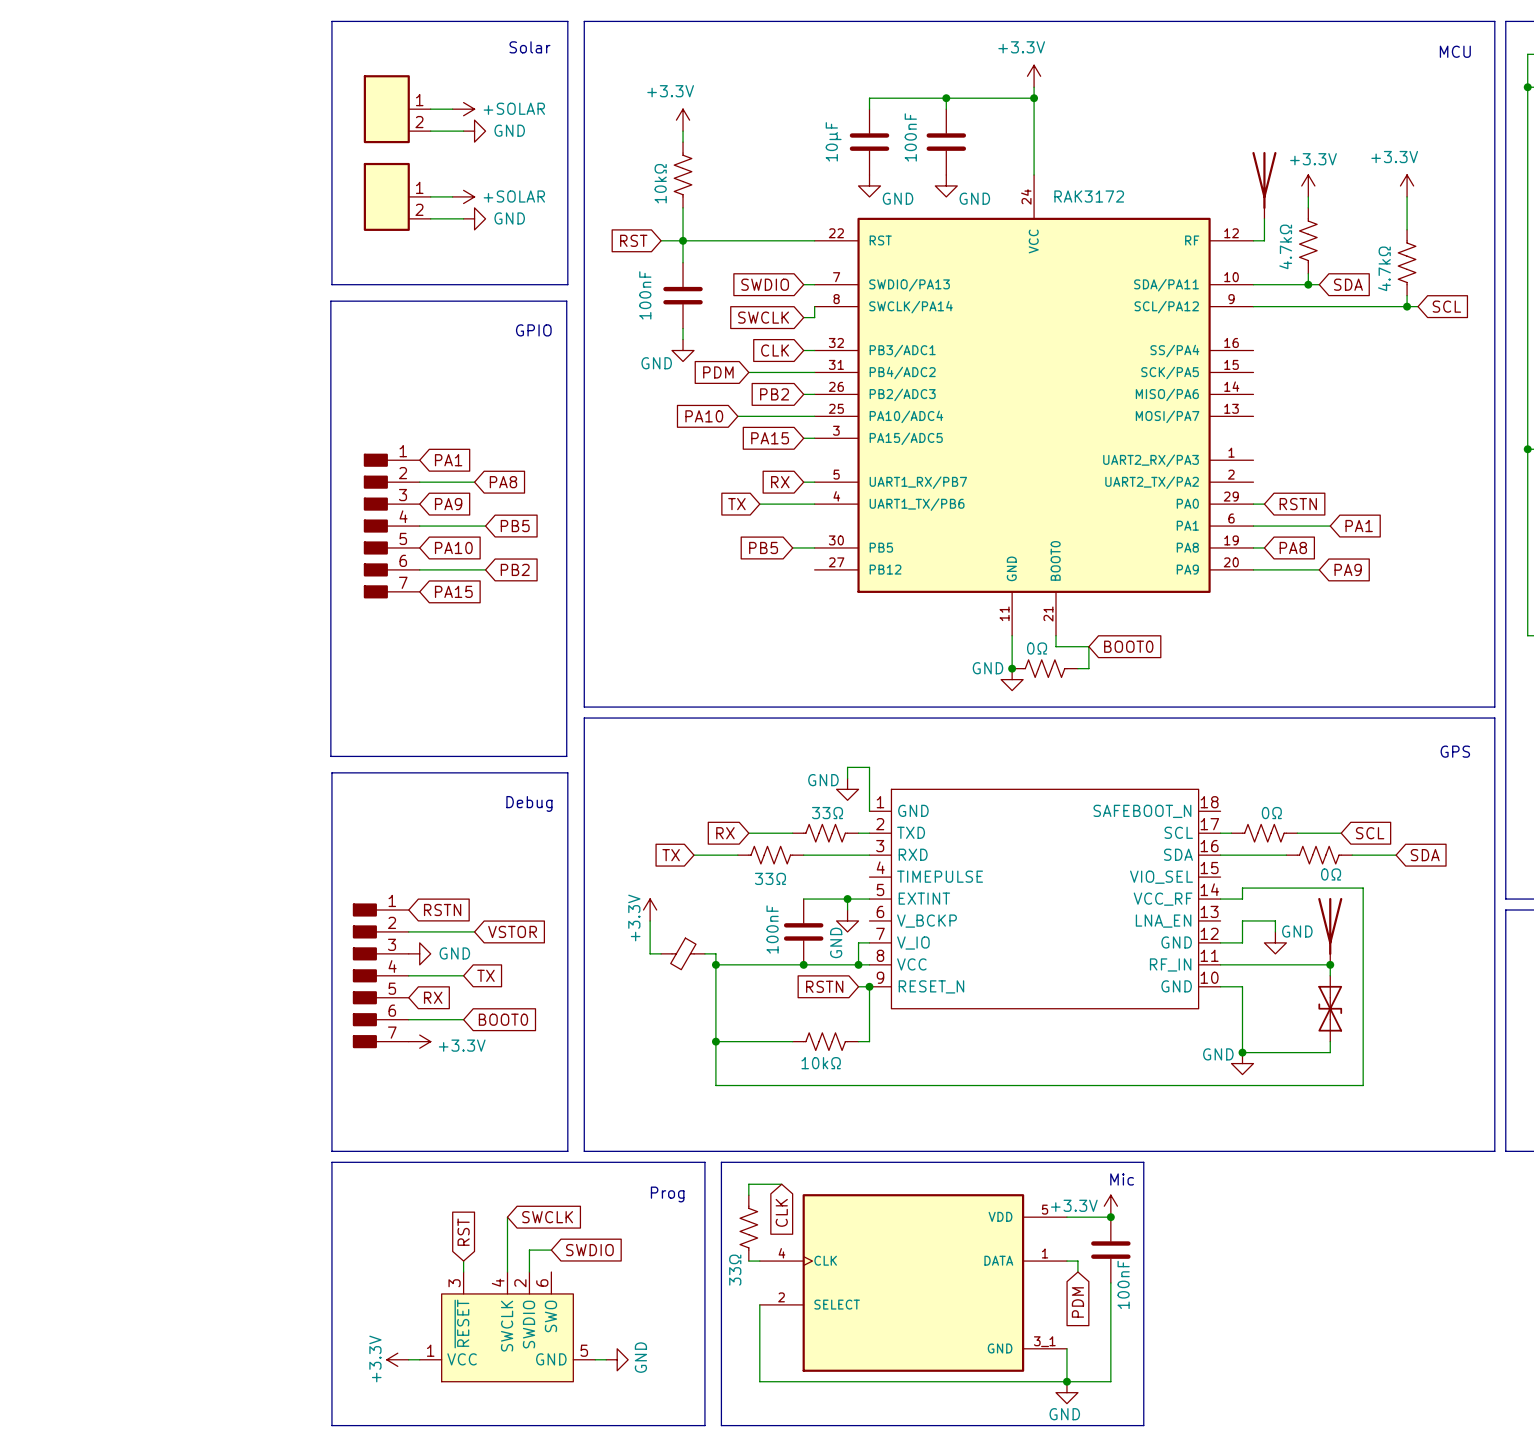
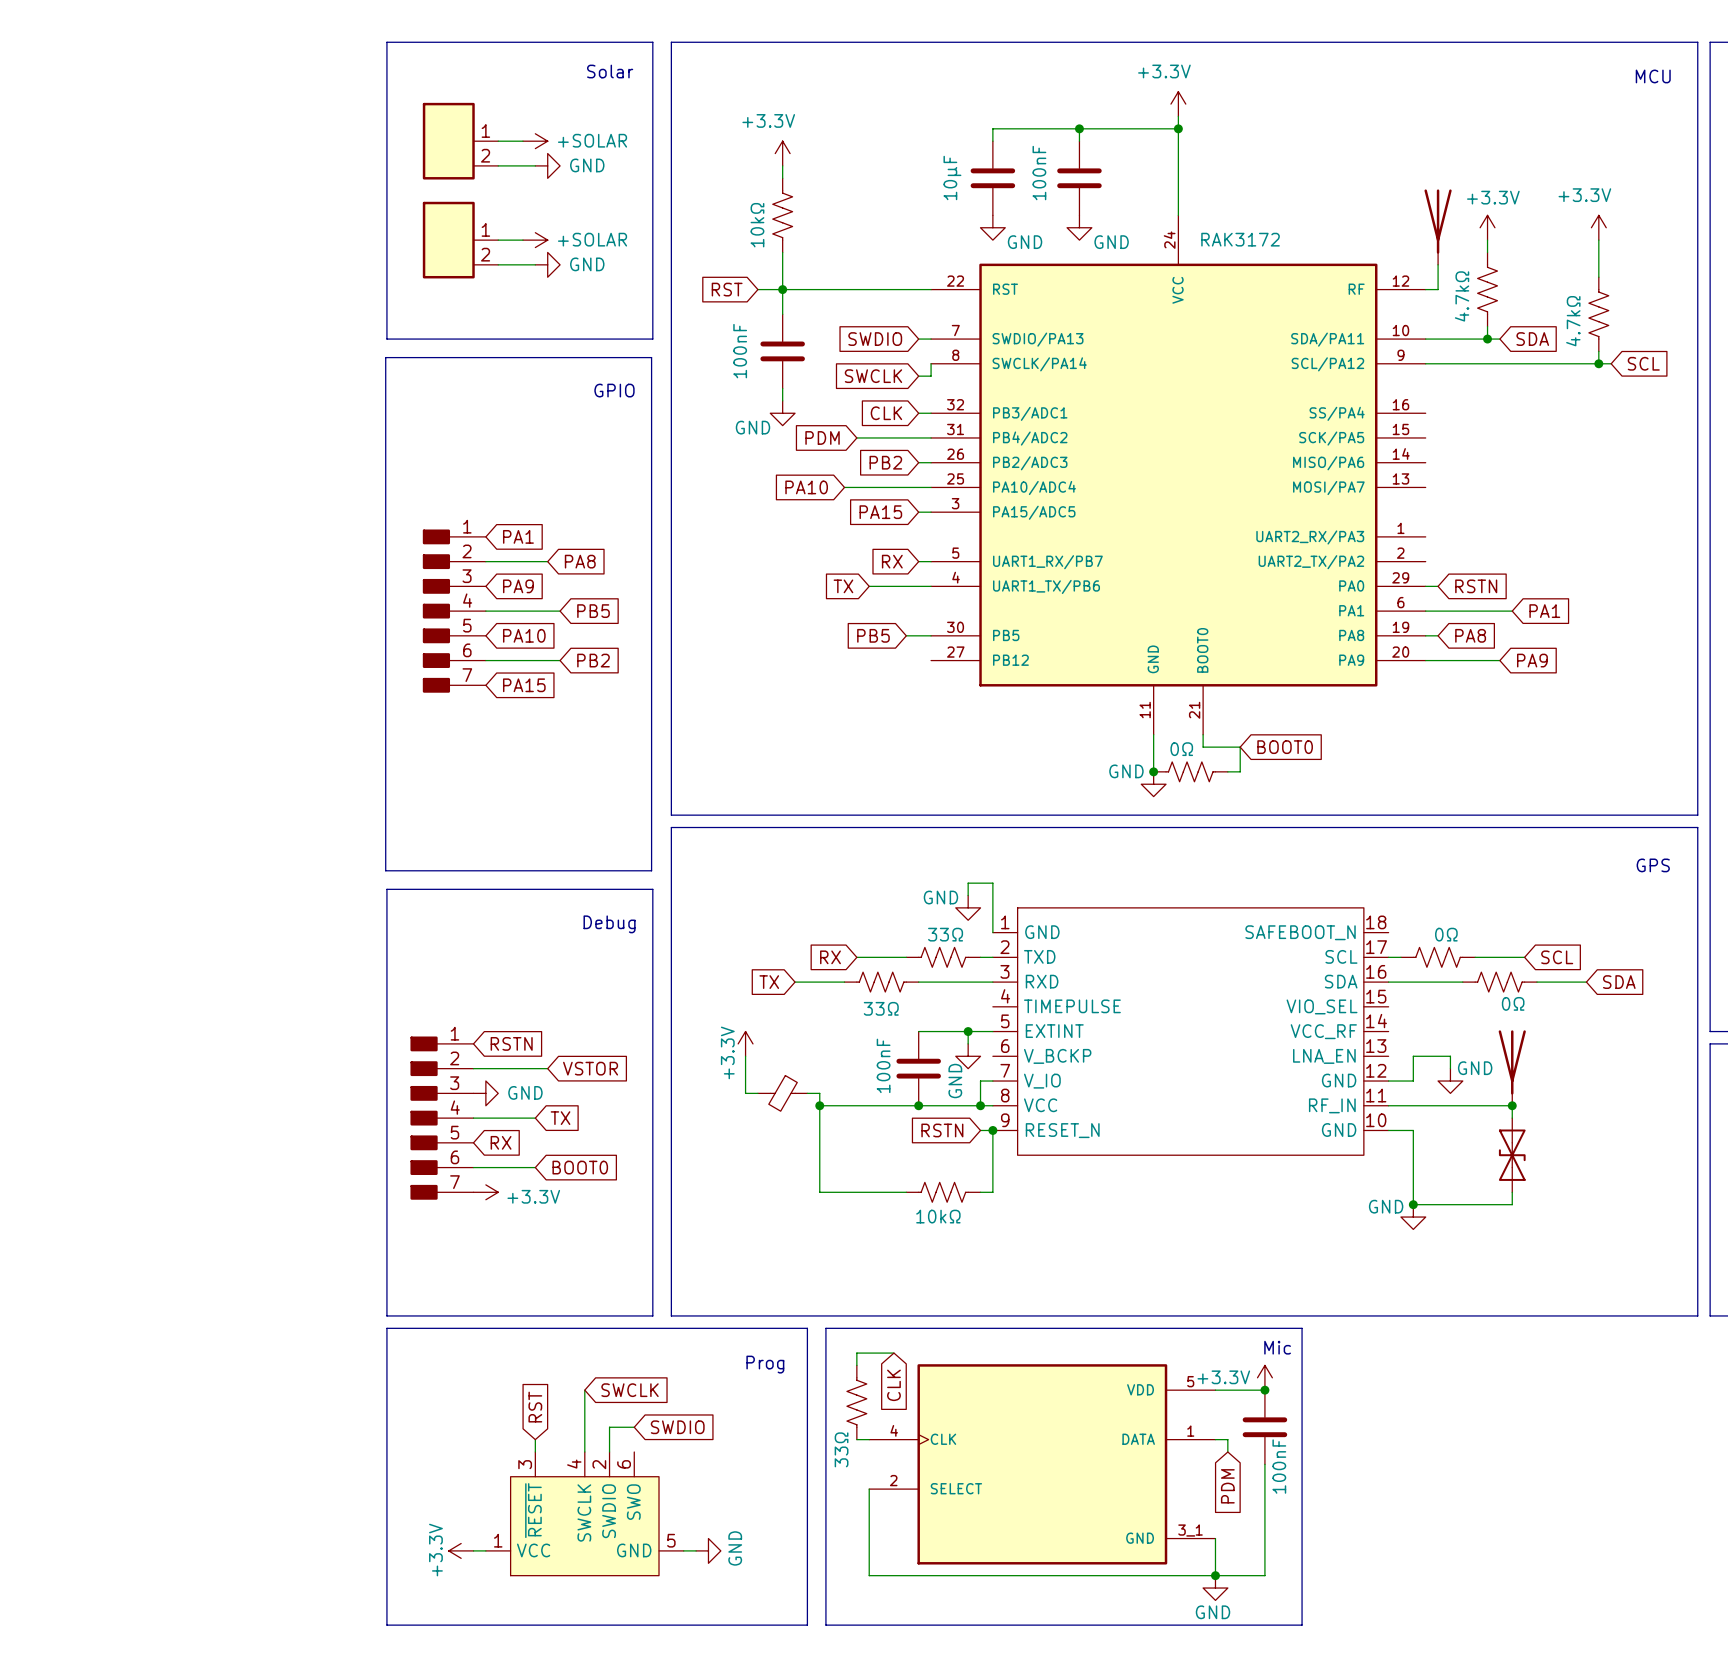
wire: (1220, 899) (1242, 899) (1242, 888) (1363, 888) (1363, 1085) (715, 1085) (715, 1041) -> none
junction: (715, 1041) -> none

